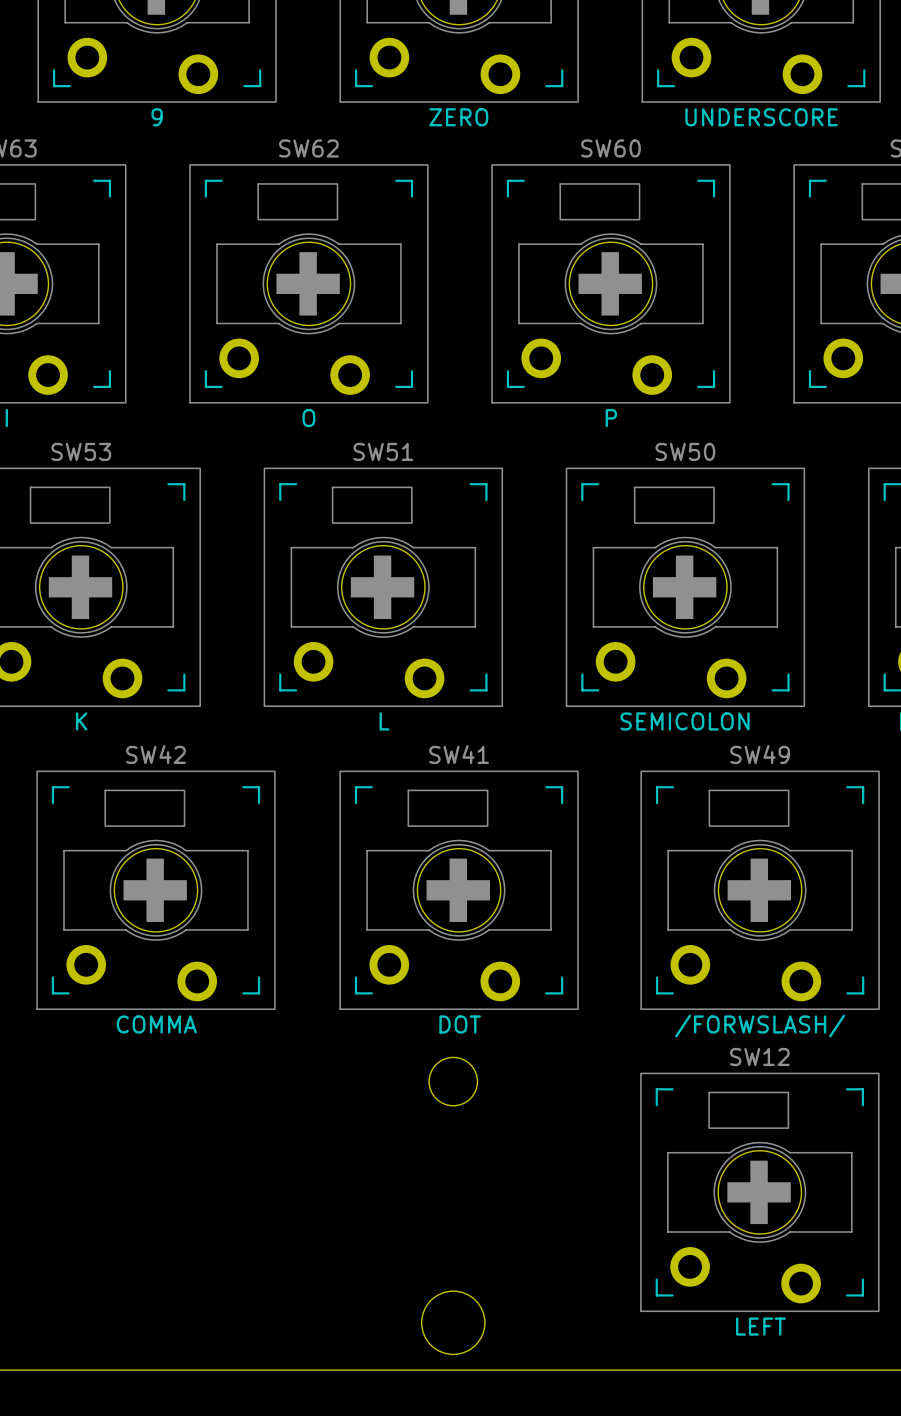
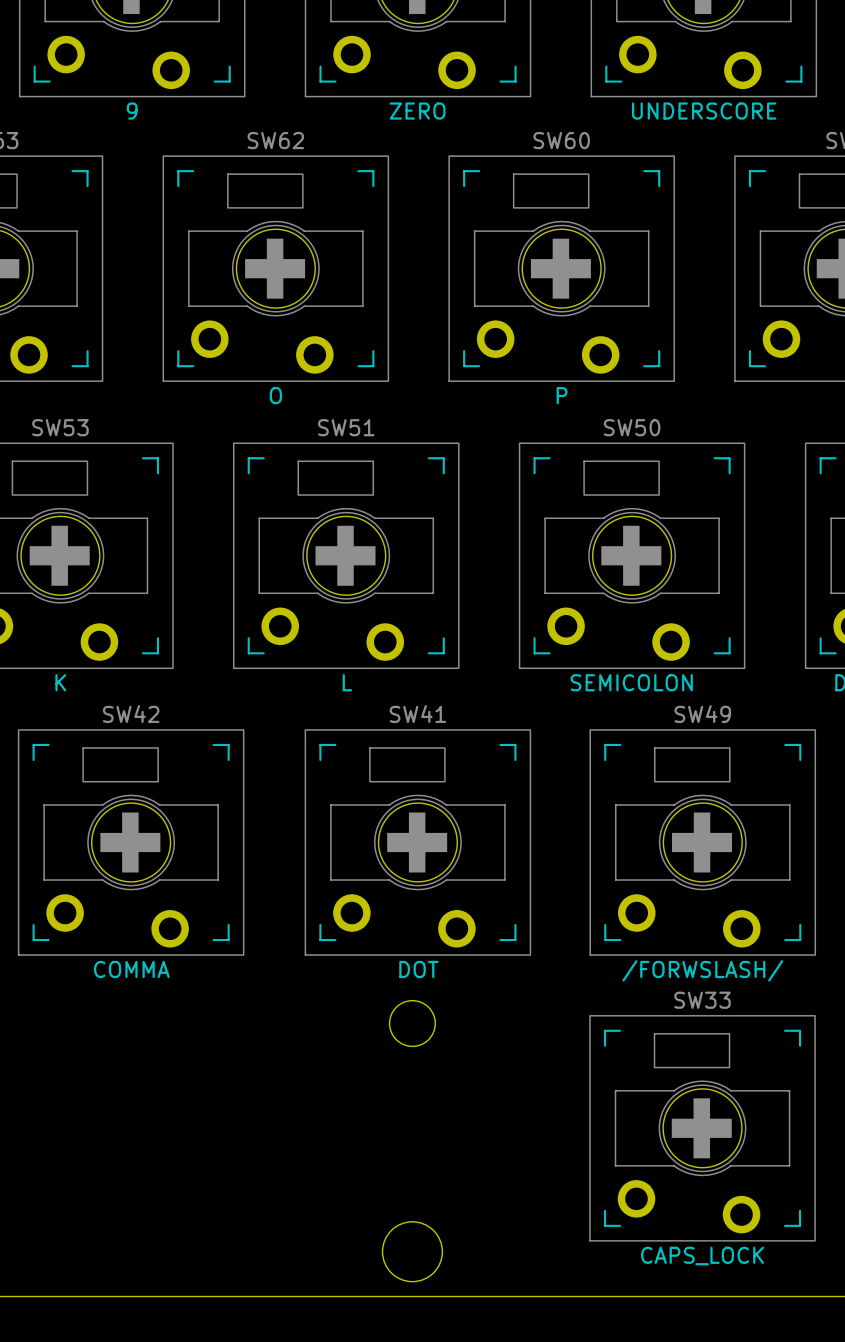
SW12 name: SW12 (759, 1056) -> SW33 (702, 1000)
SW12 value: LEFT (760, 1326) -> CAPS_LOCK (702, 1256)

